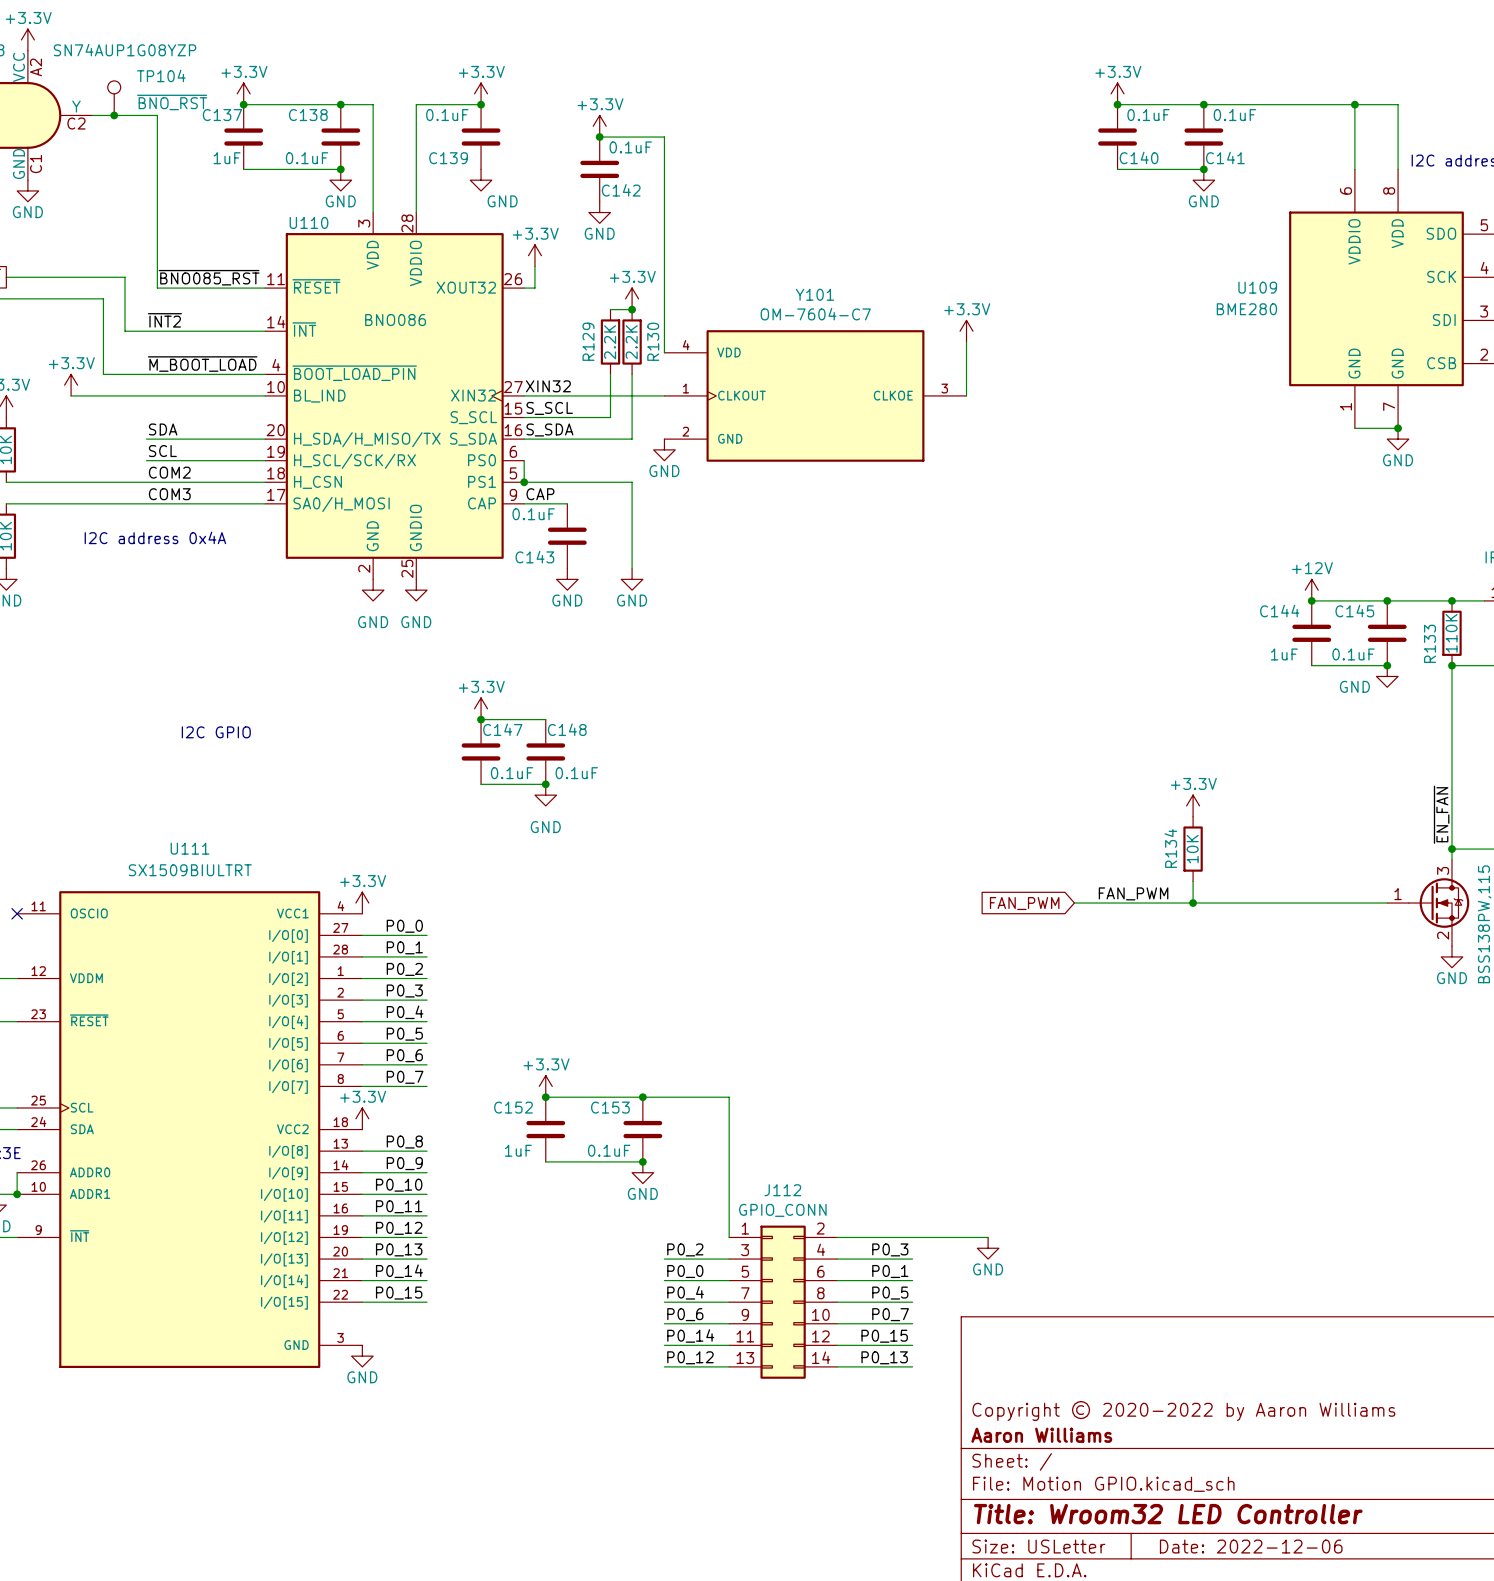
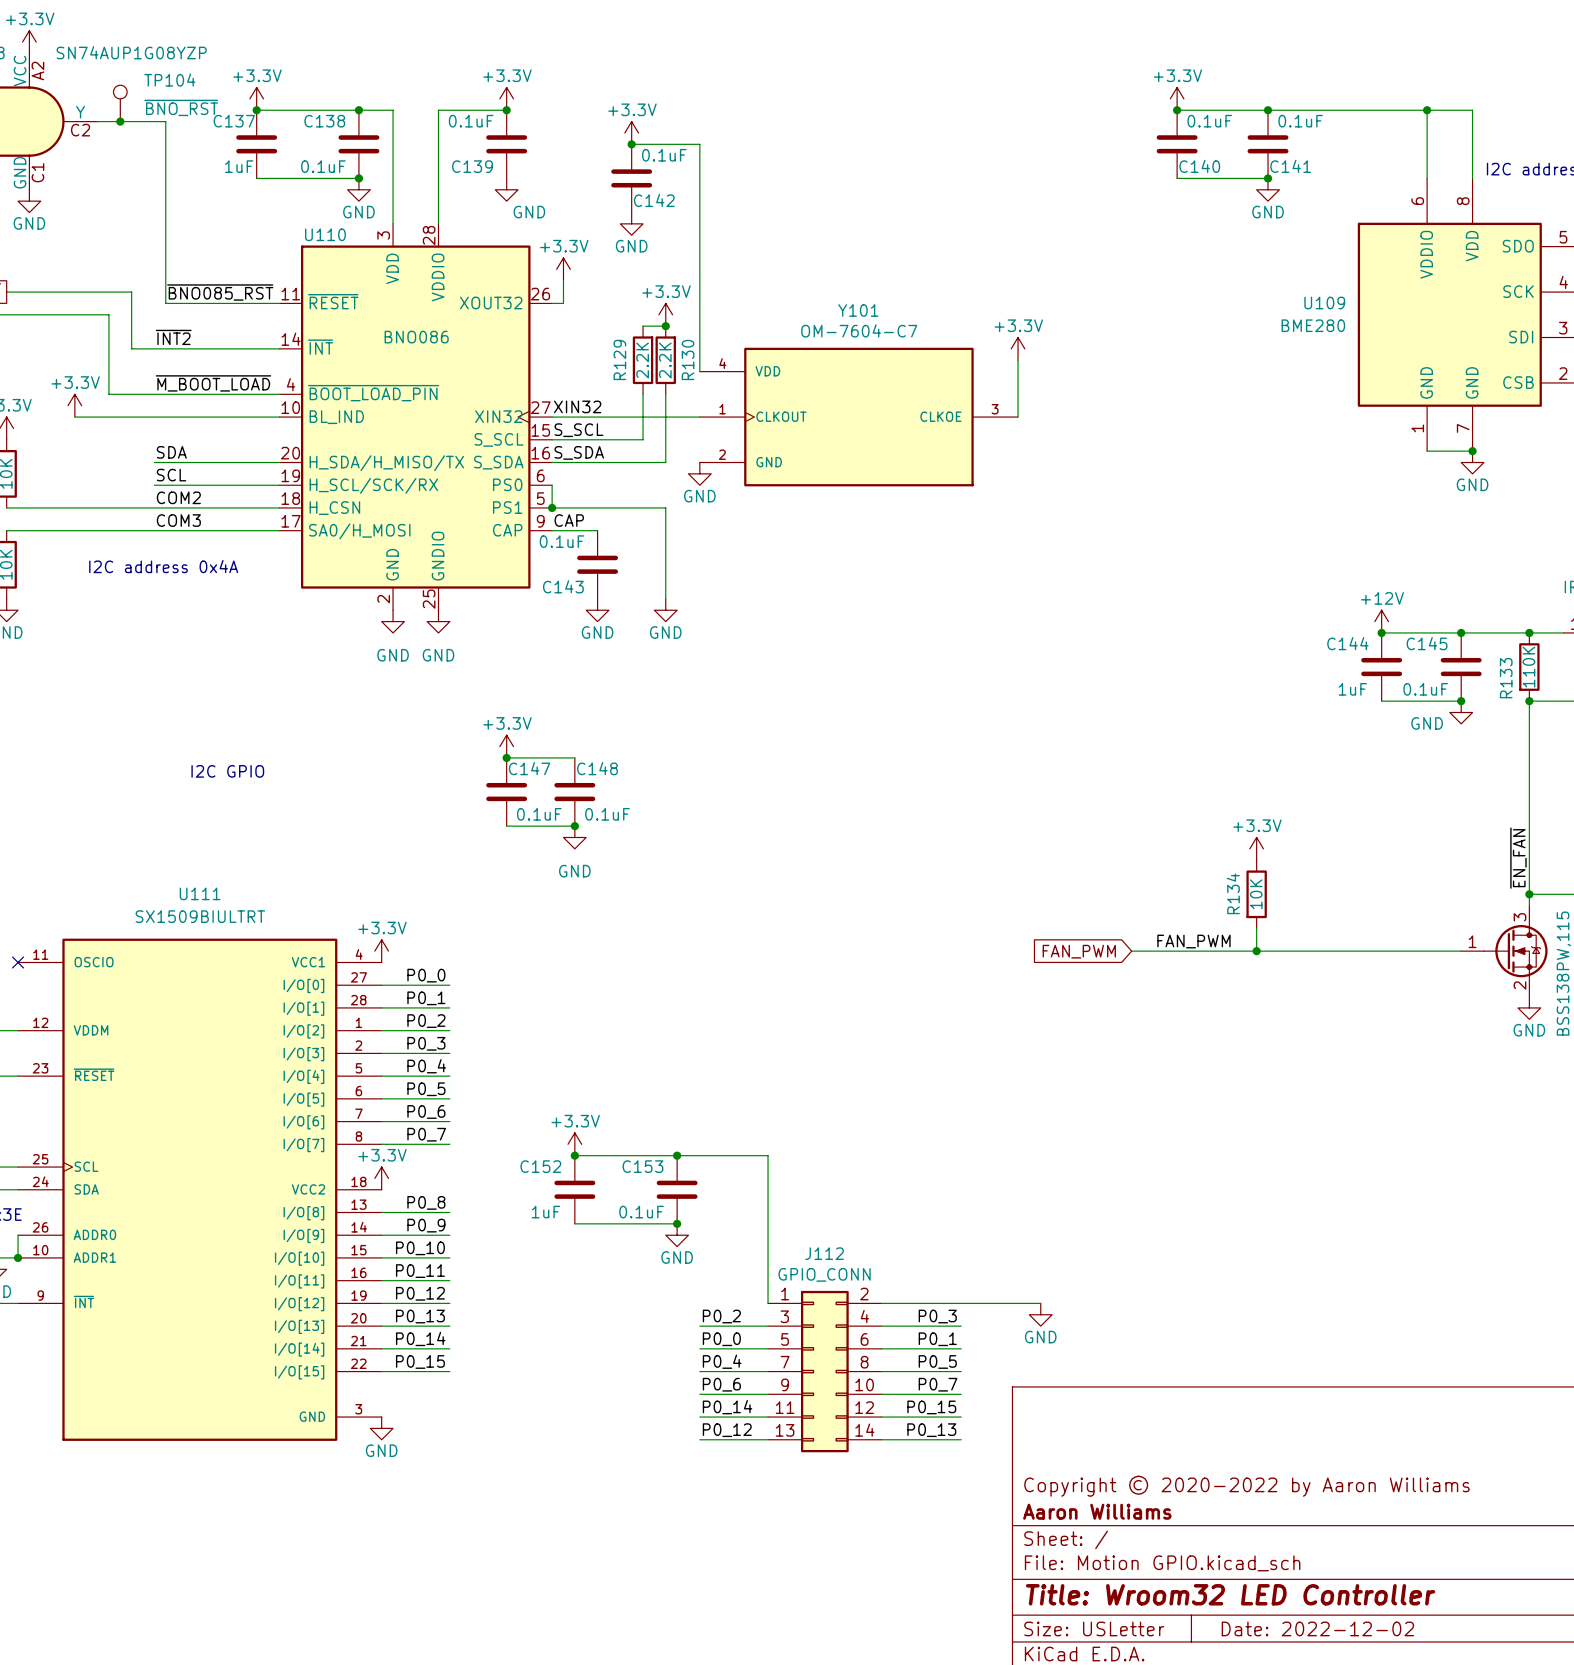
title block: Date: 2022-12-06 (1251, 1546) -> Date: 2022-12-02 (1317, 1628)

